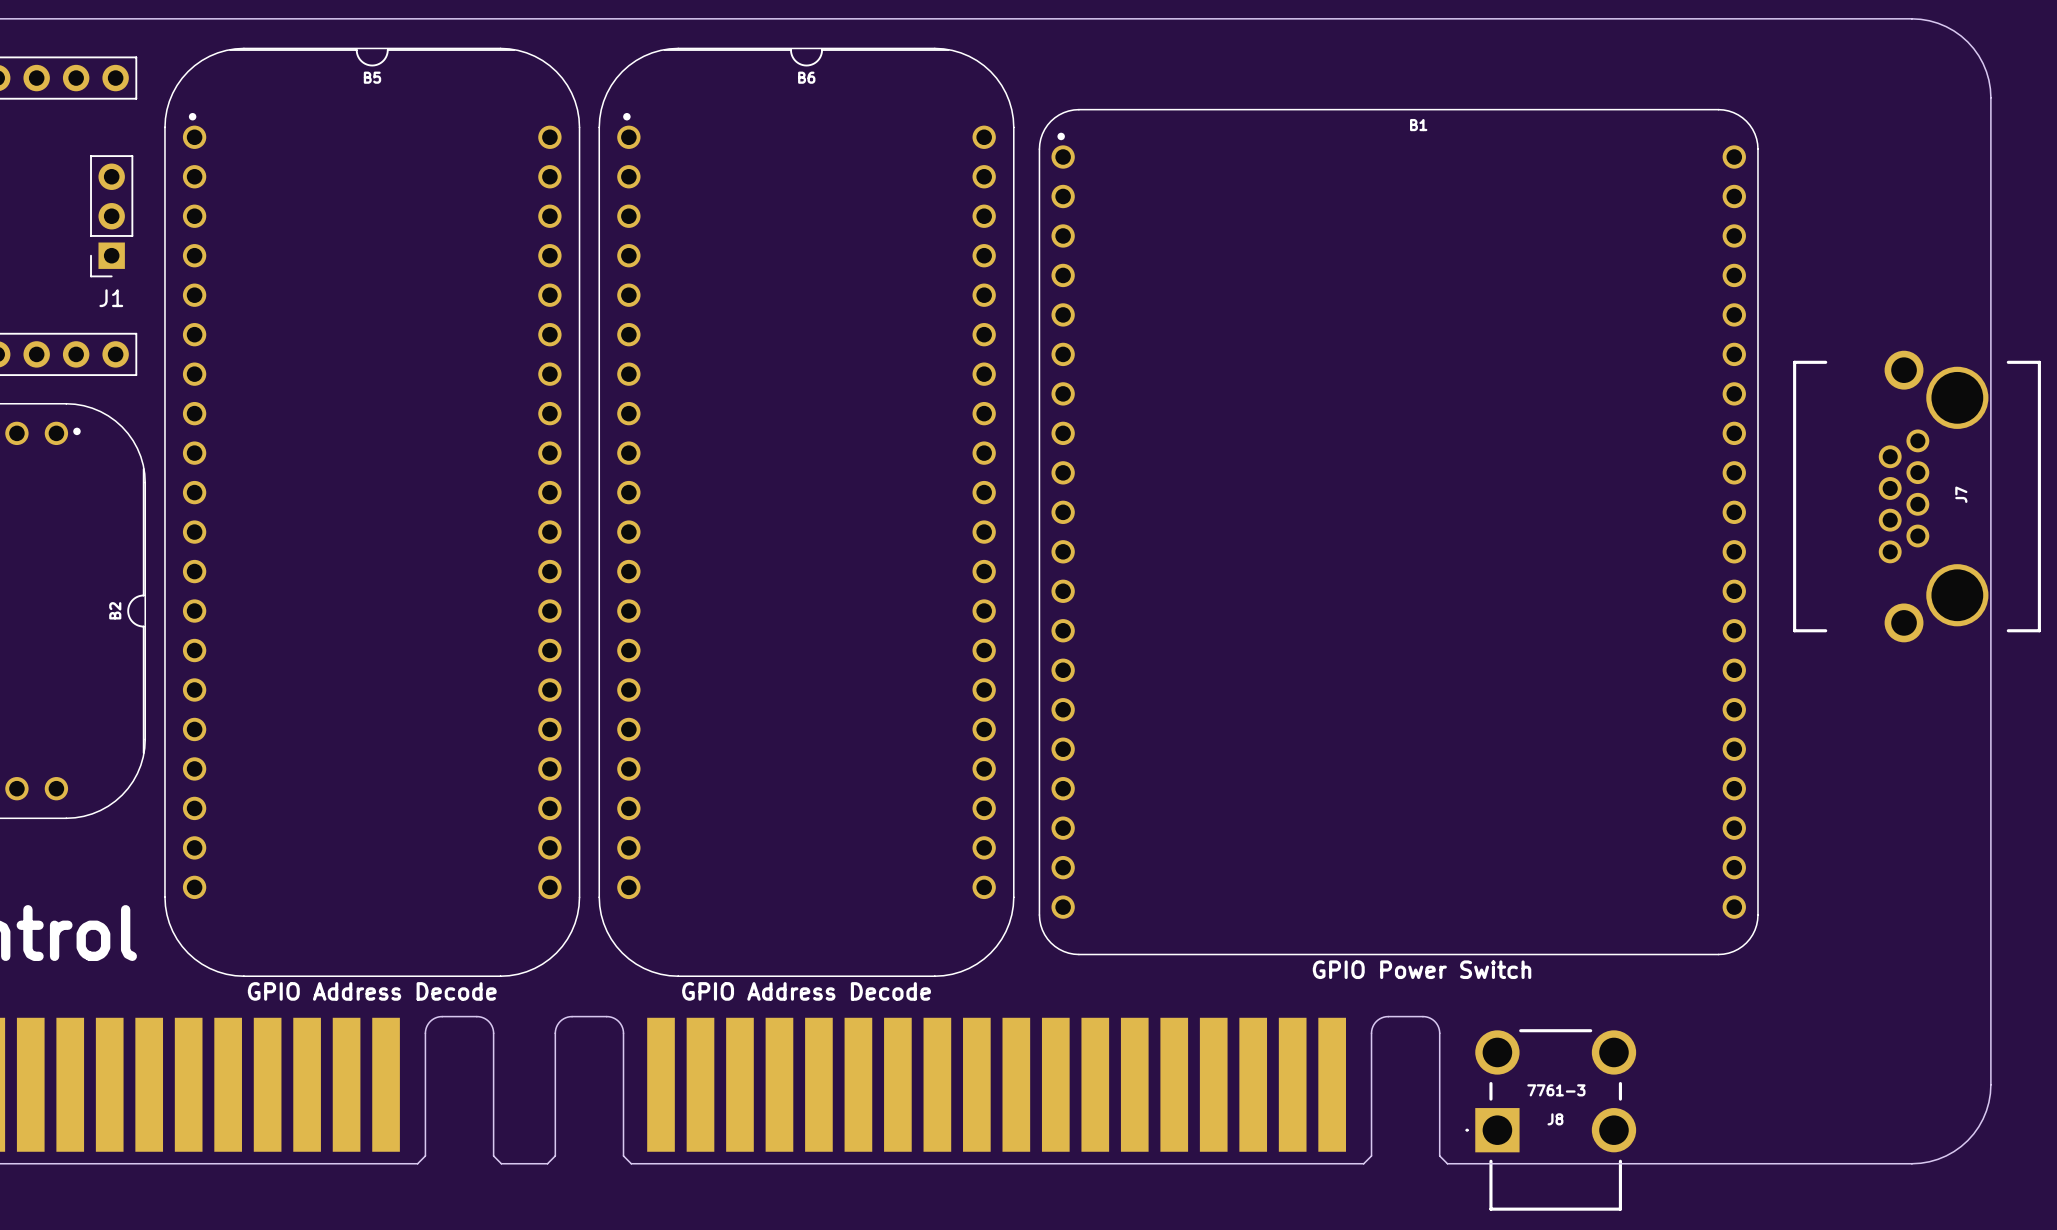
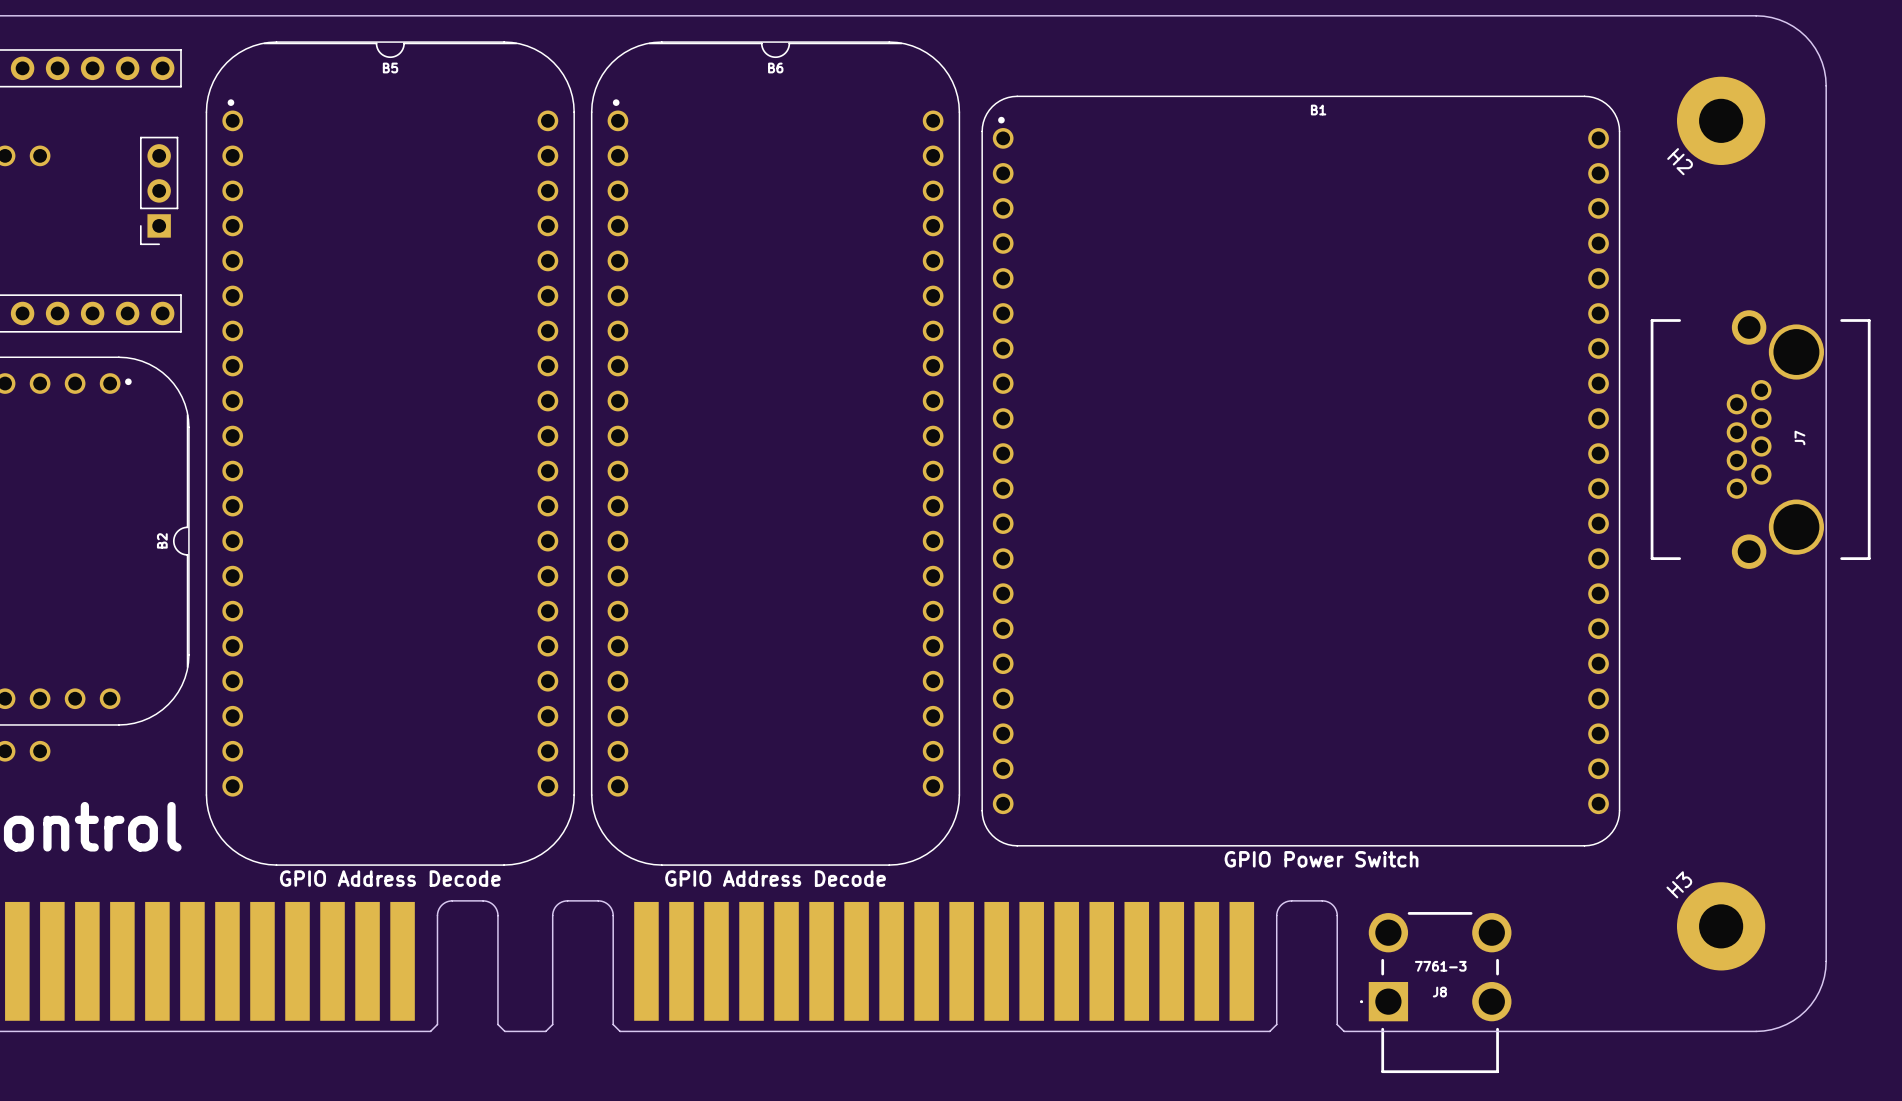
H2: none -> (1721, 120)
J1 name: J1 (111, 298) -> none
H3: none -> (1721, 926)

